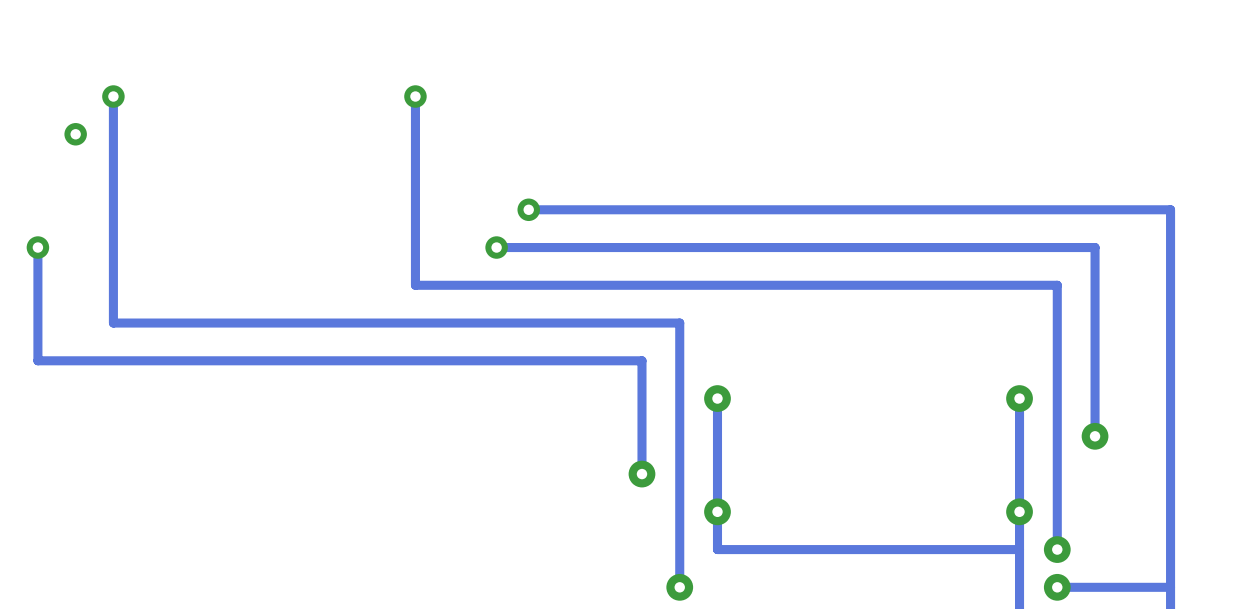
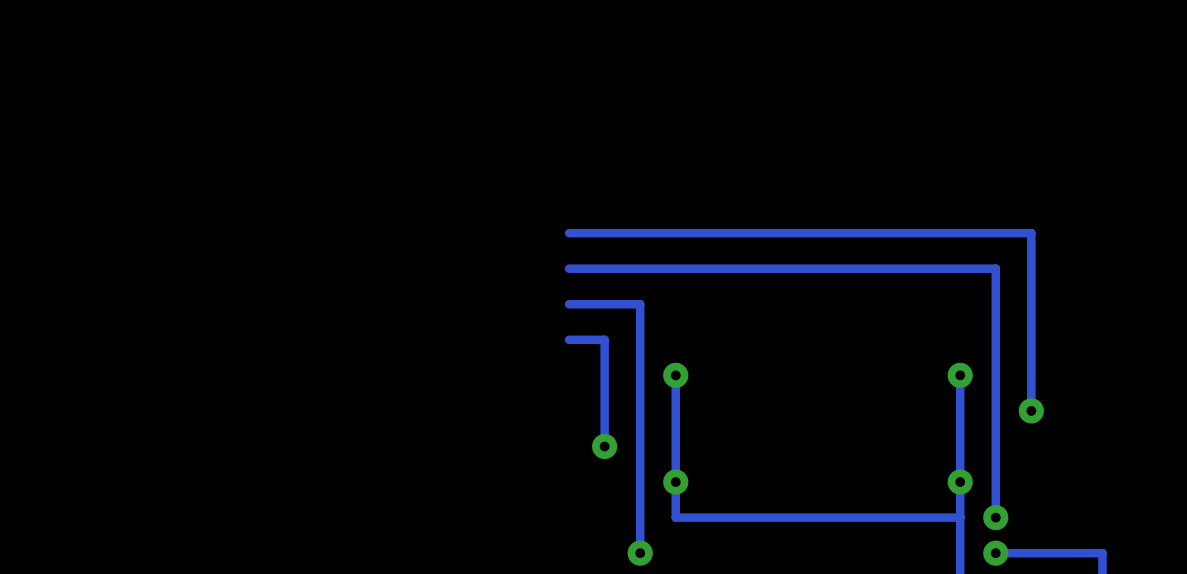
track: (113, 96) (113, 323) (604, 323) -> none
via: (113, 96) -> none
track: (415, 96) (415, 285) (604, 285) -> none
via: (415, 96) -> none
via: (75, 134) -> none
track: (528, 209) (1170, 209) (1170, 587) -> none
via: (528, 209) -> none
track: (37, 247) (37, 360) (604, 360) -> none
via: (37, 247) -> none
via: (496, 247) -> none
track: (604, 247) (496, 247) -> none

